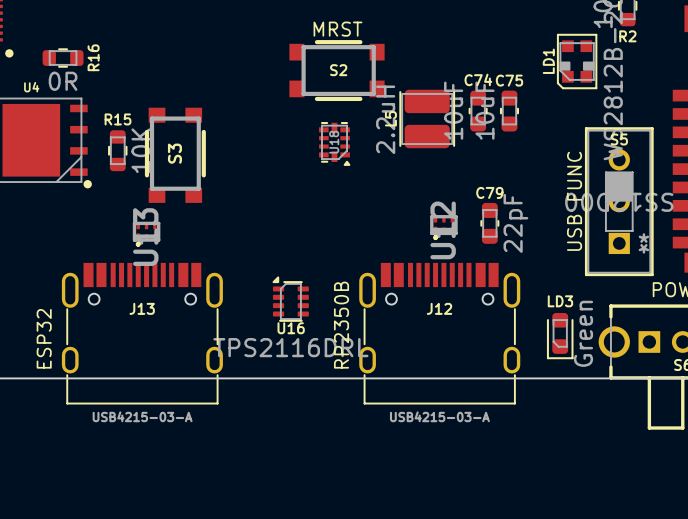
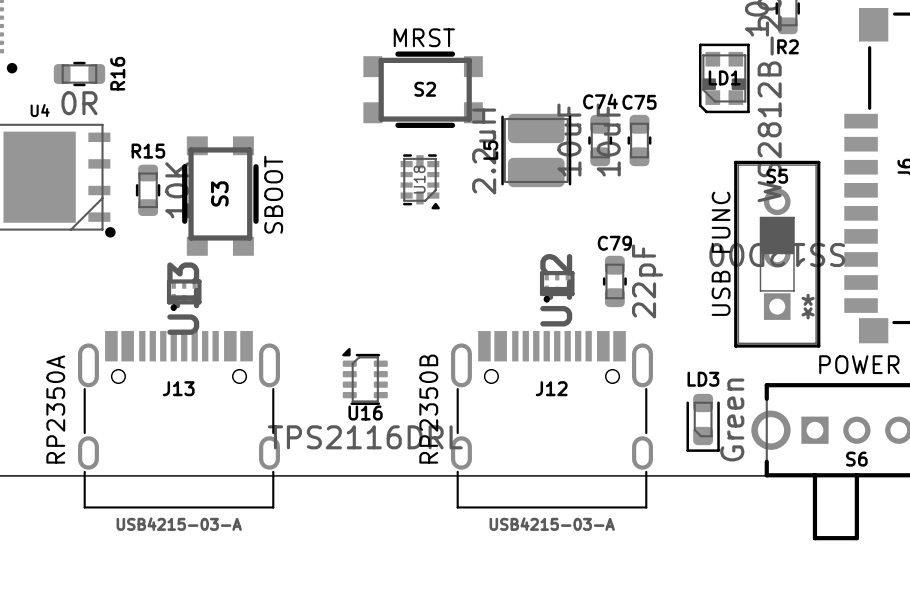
LD1 name rotation: 0° (548, 61) -> 90° clockwise (724, 77)
text: none -> SBOOT (273, 194)
text: ESP32 (44, 338) -> RP2350A (55, 409)

